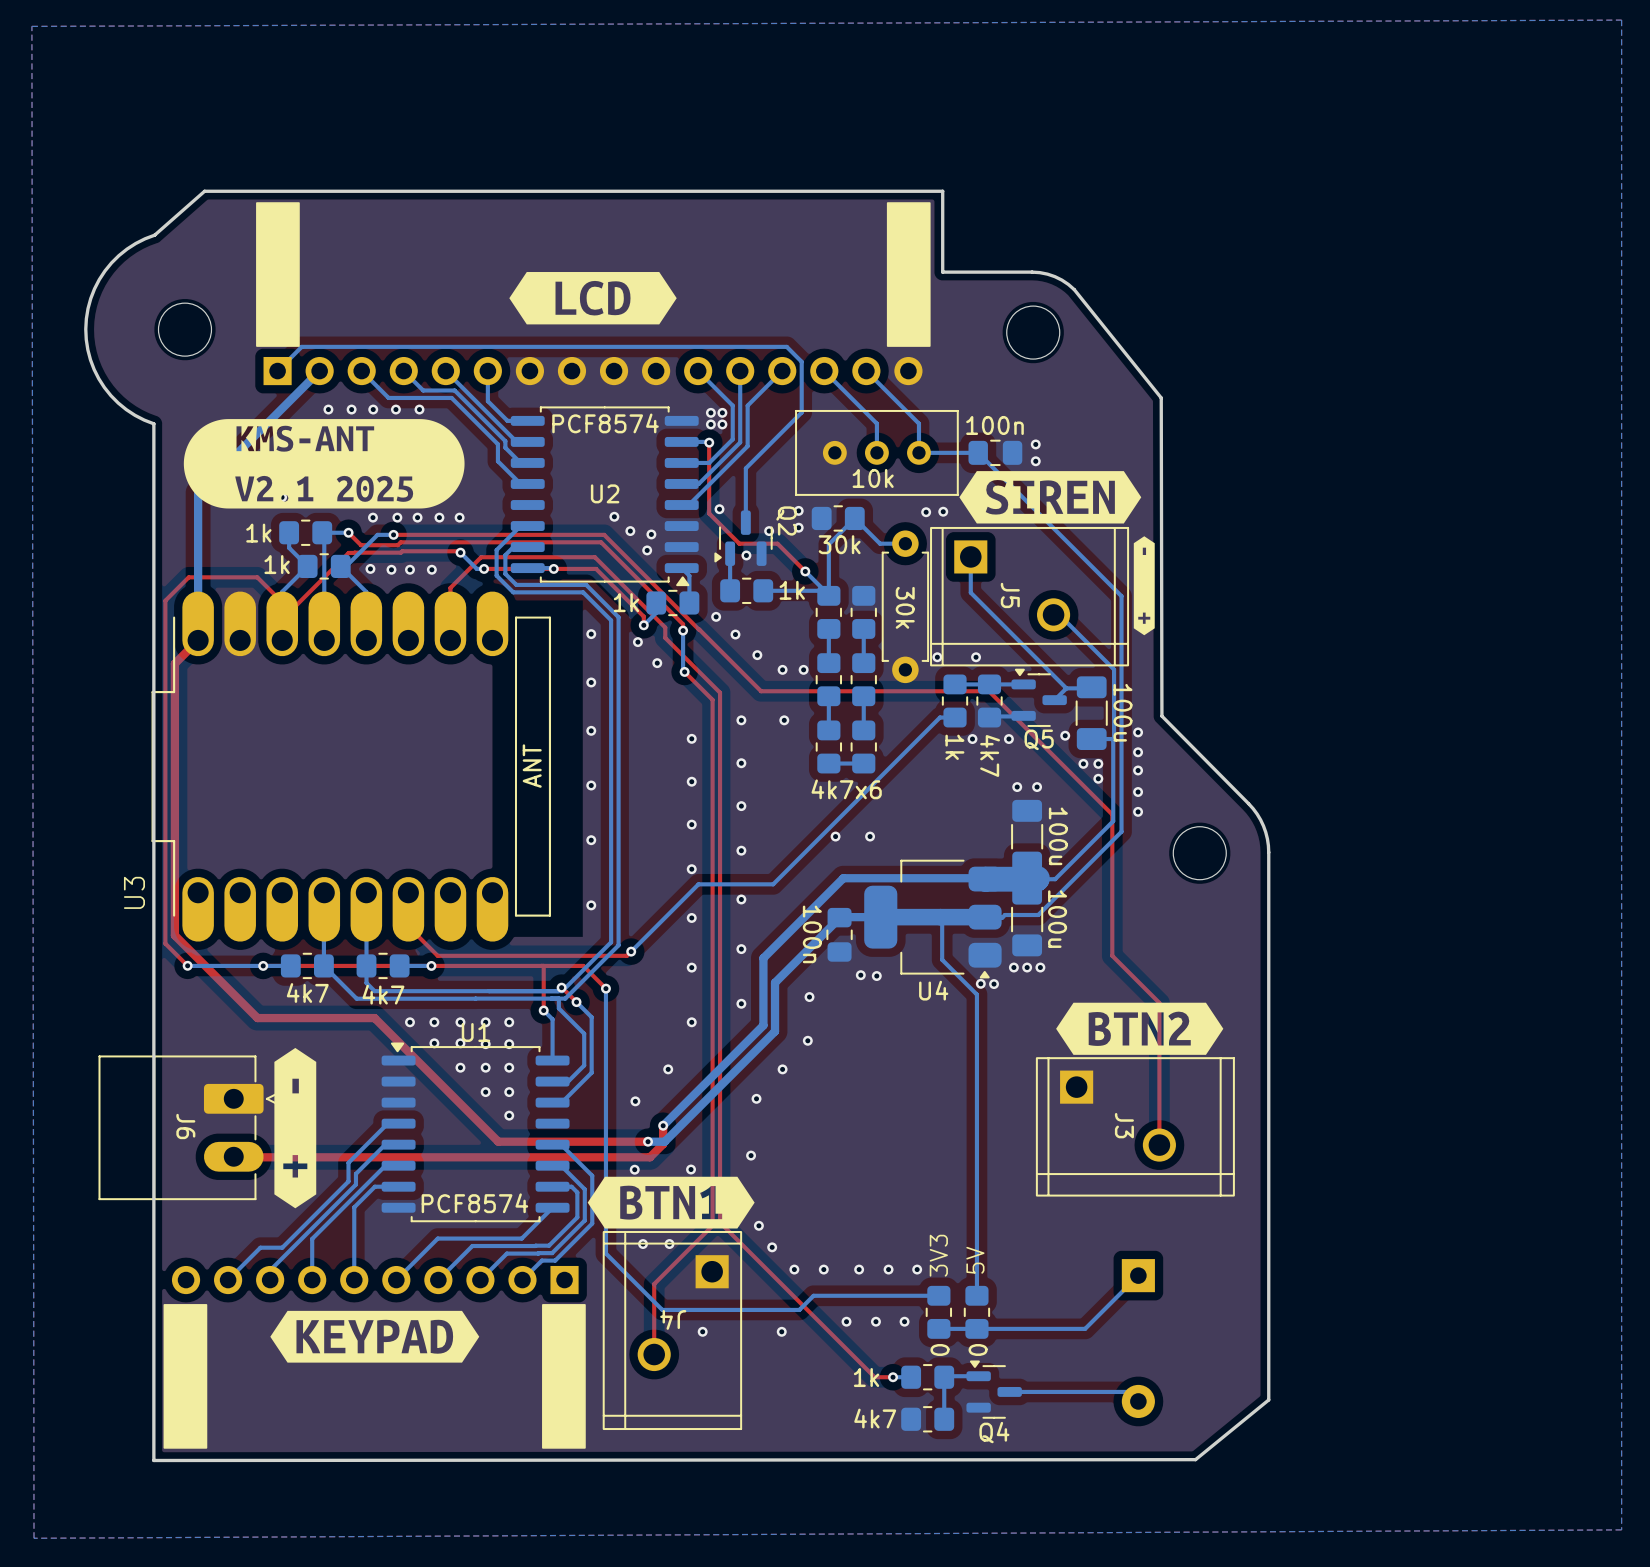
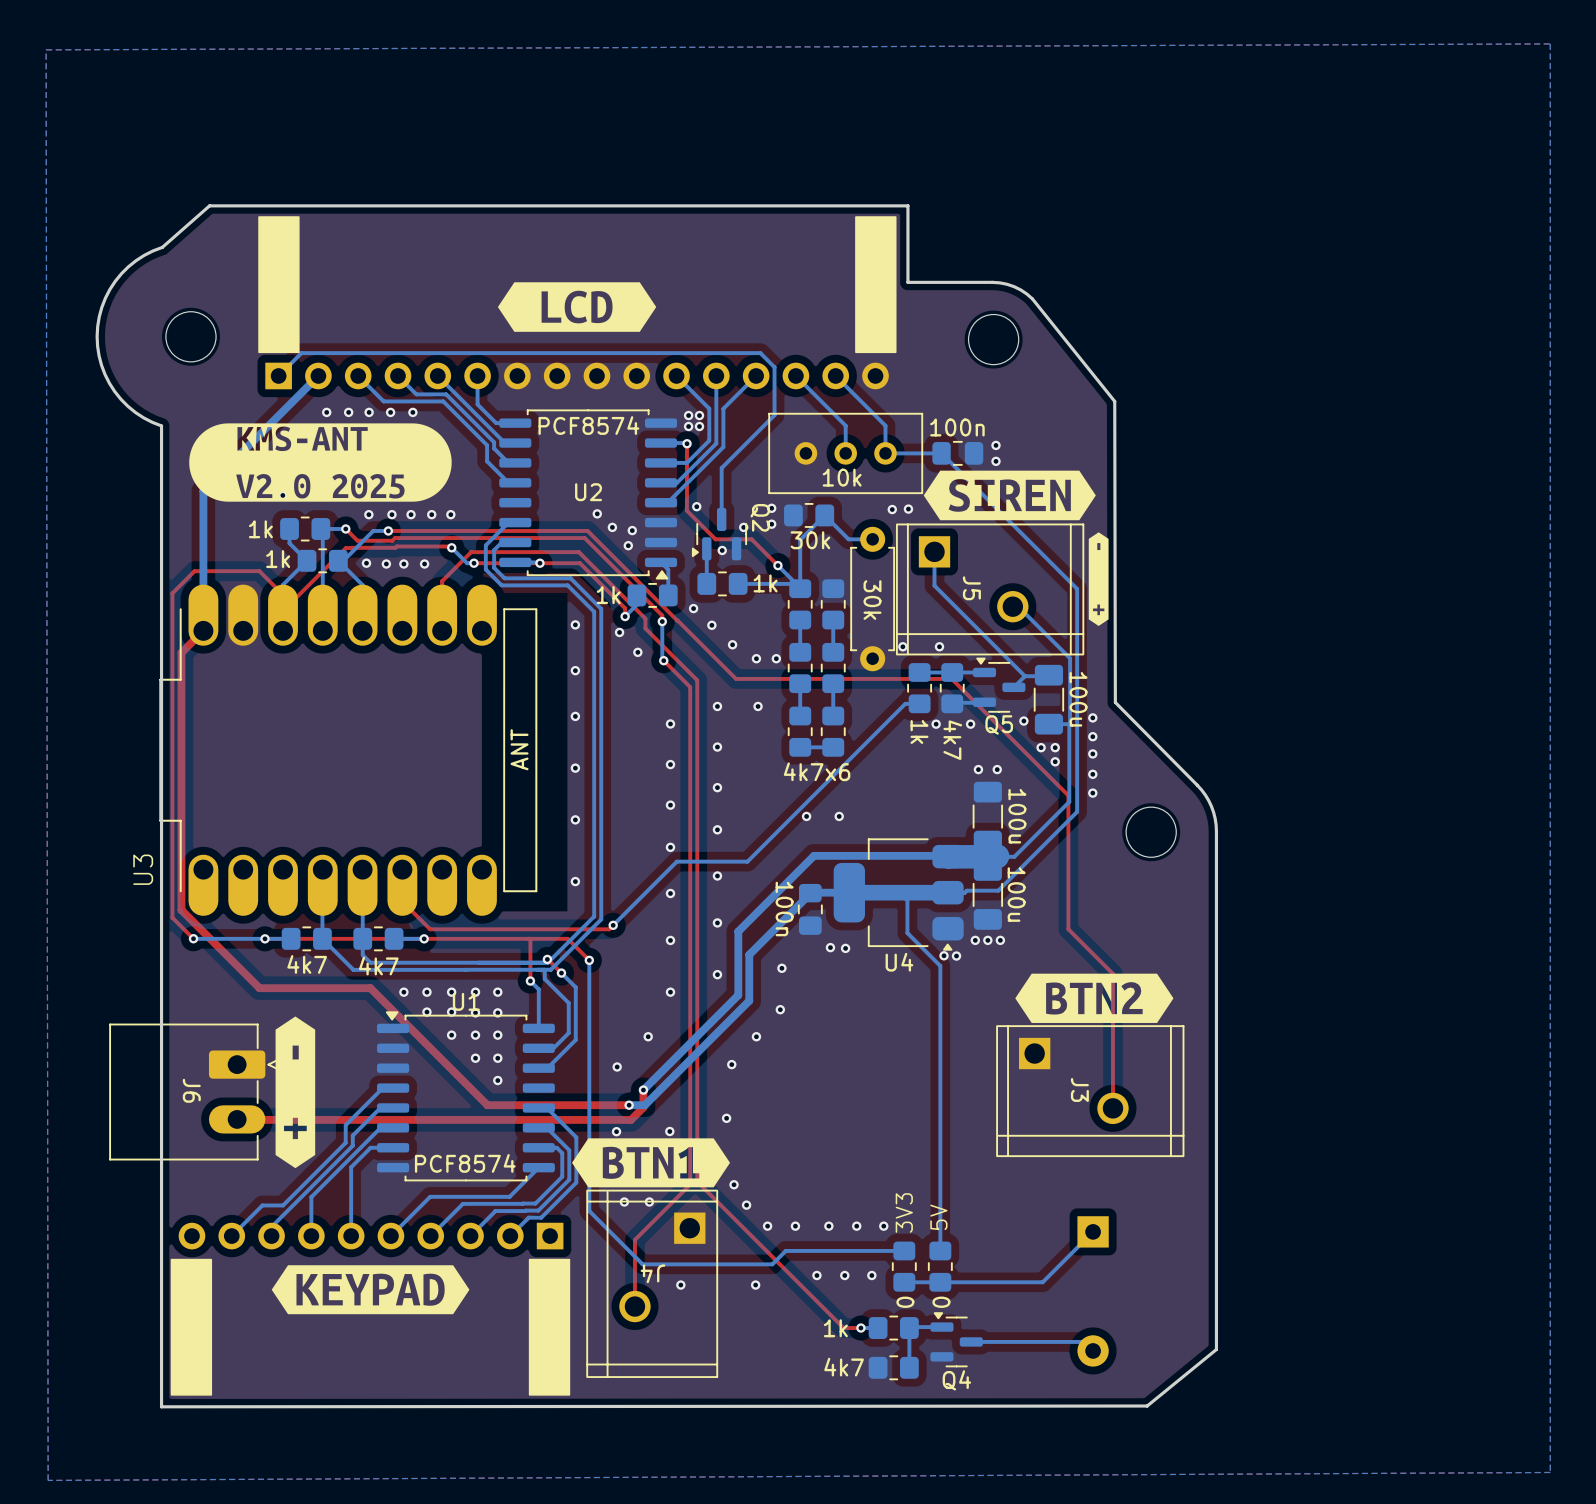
drawing shape: [183, 419, 465, 509] -> [189, 423, 452, 502]

